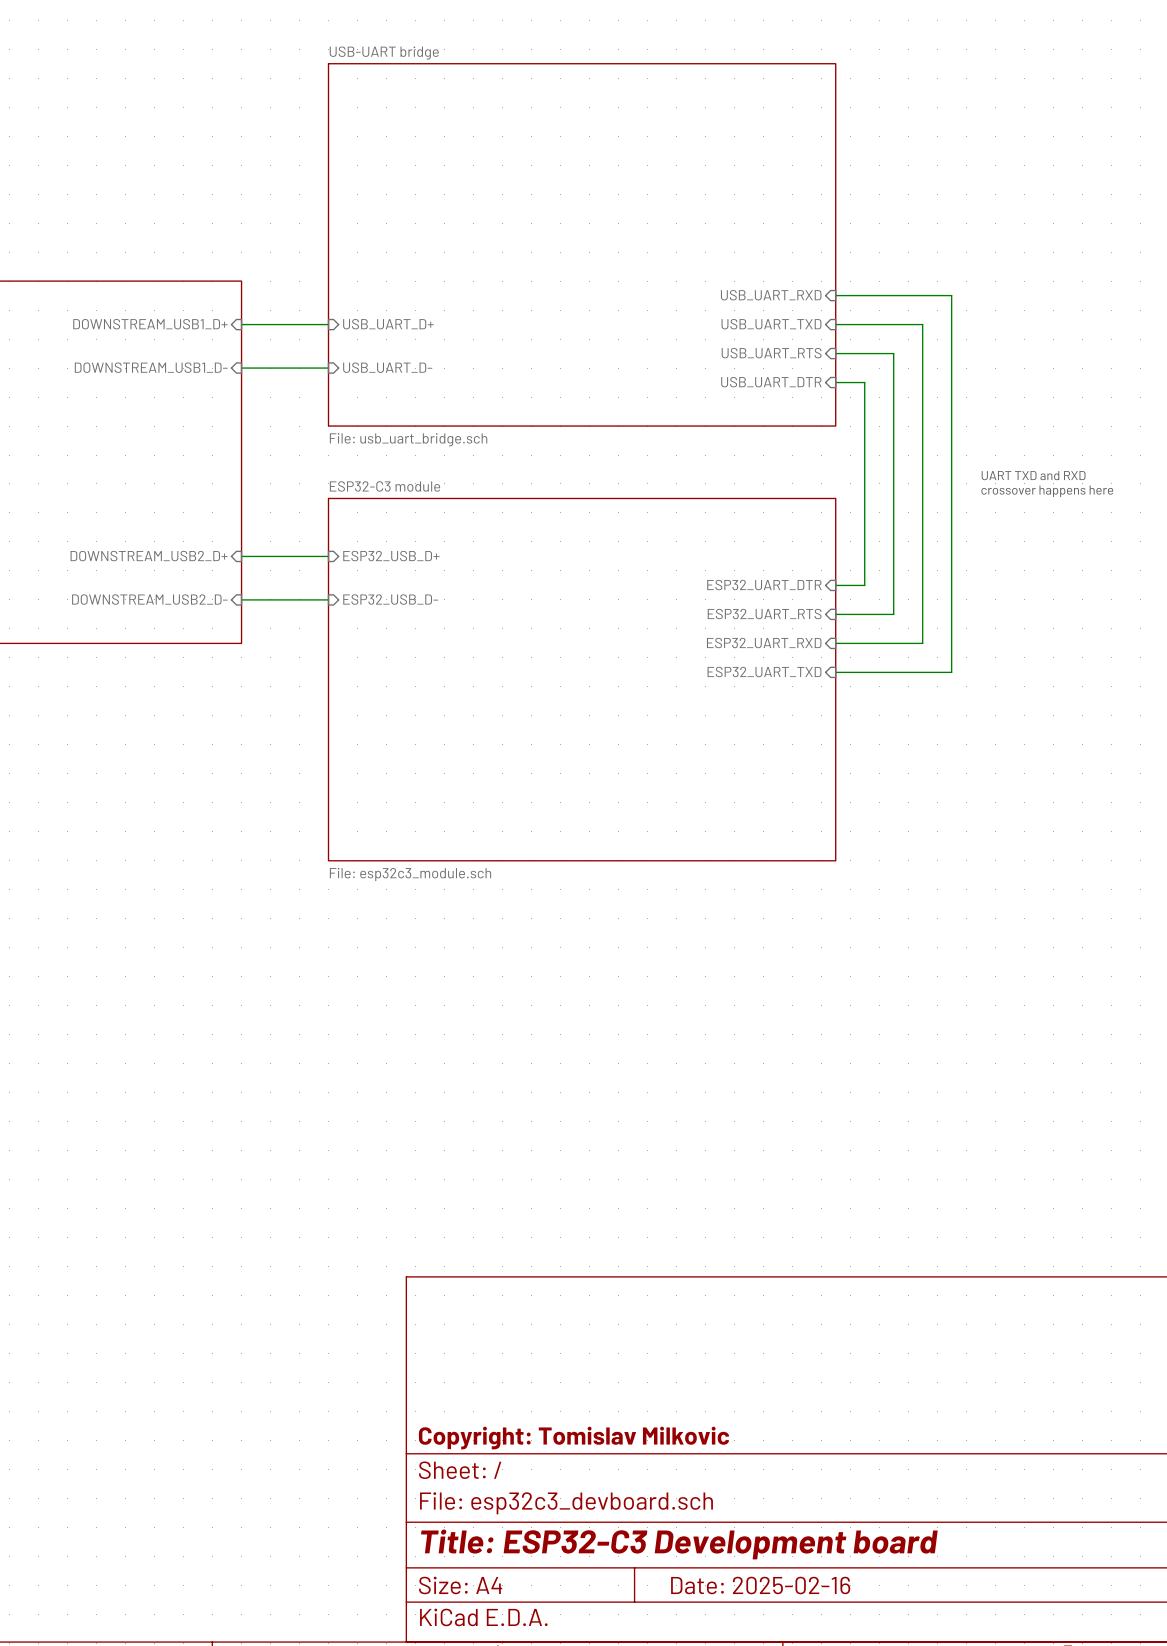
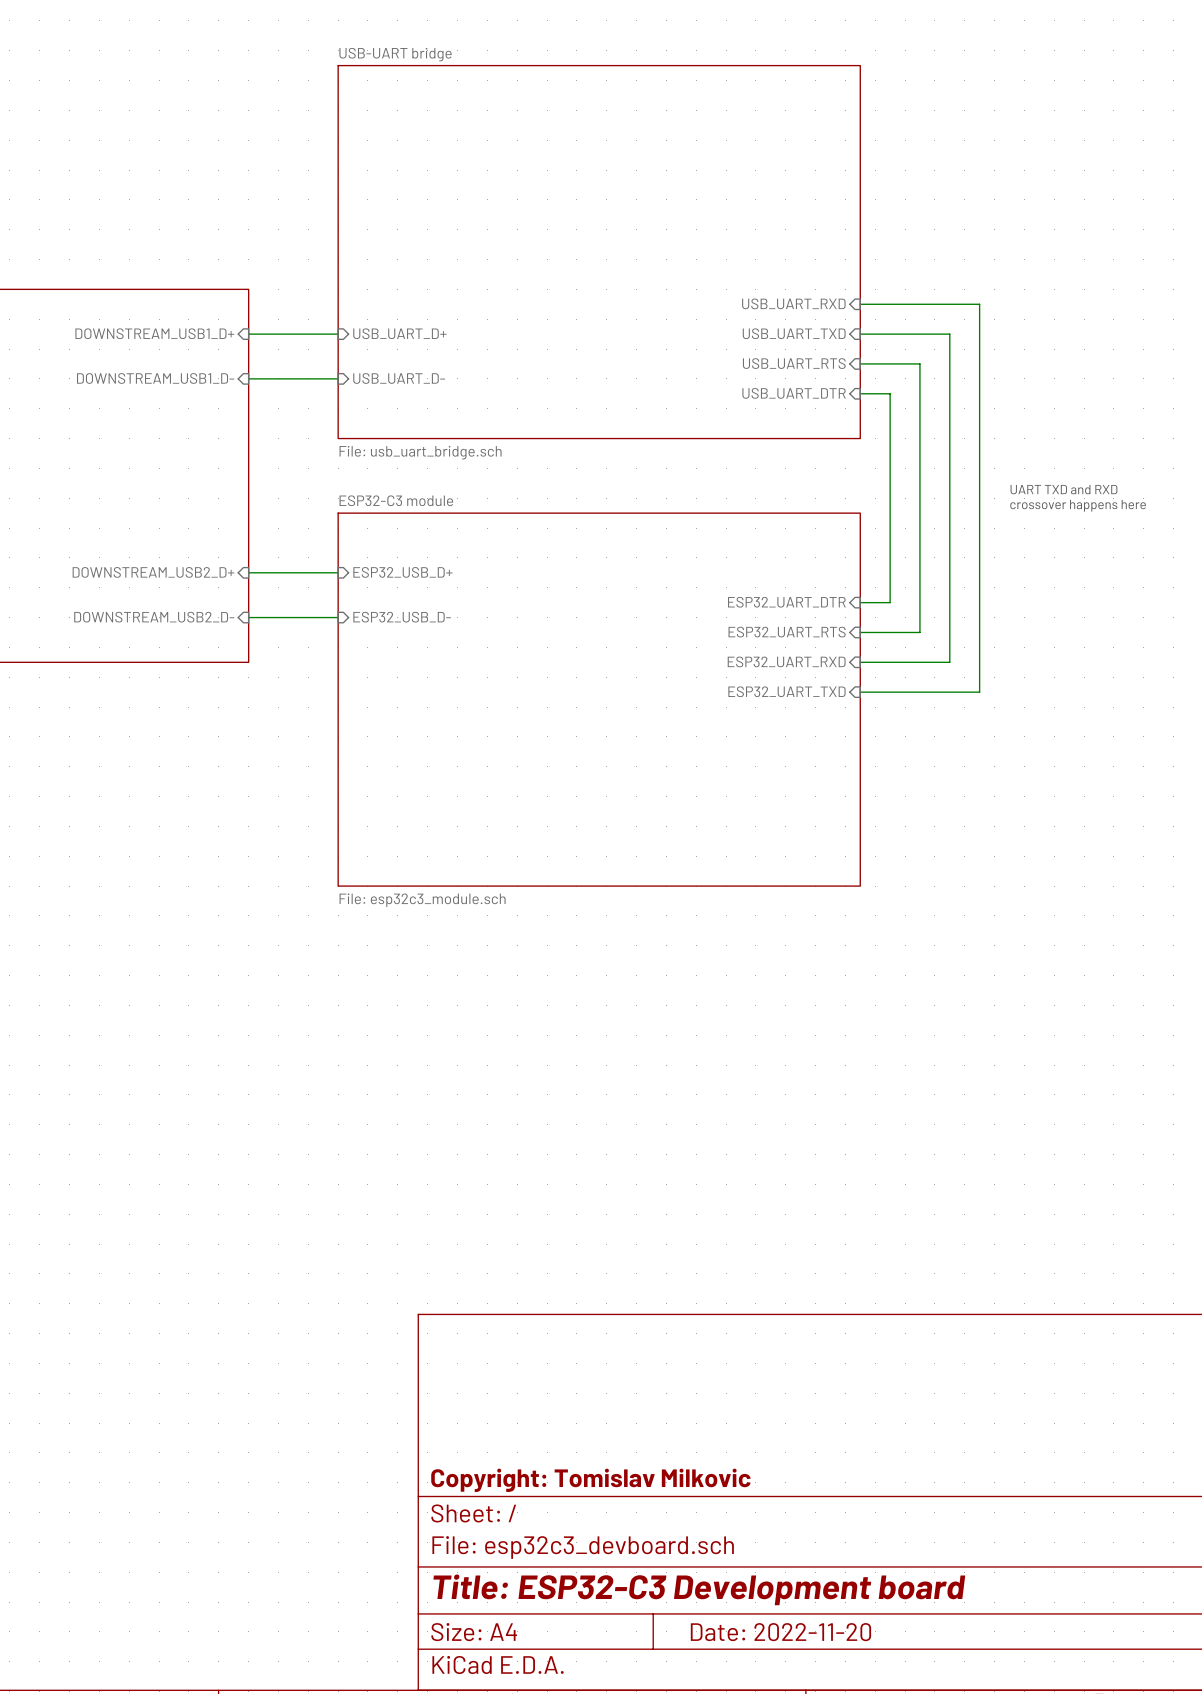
title block: Date: 2025-02-16 (760, 1585) -> Date: 2022-11-20 (780, 1632)

